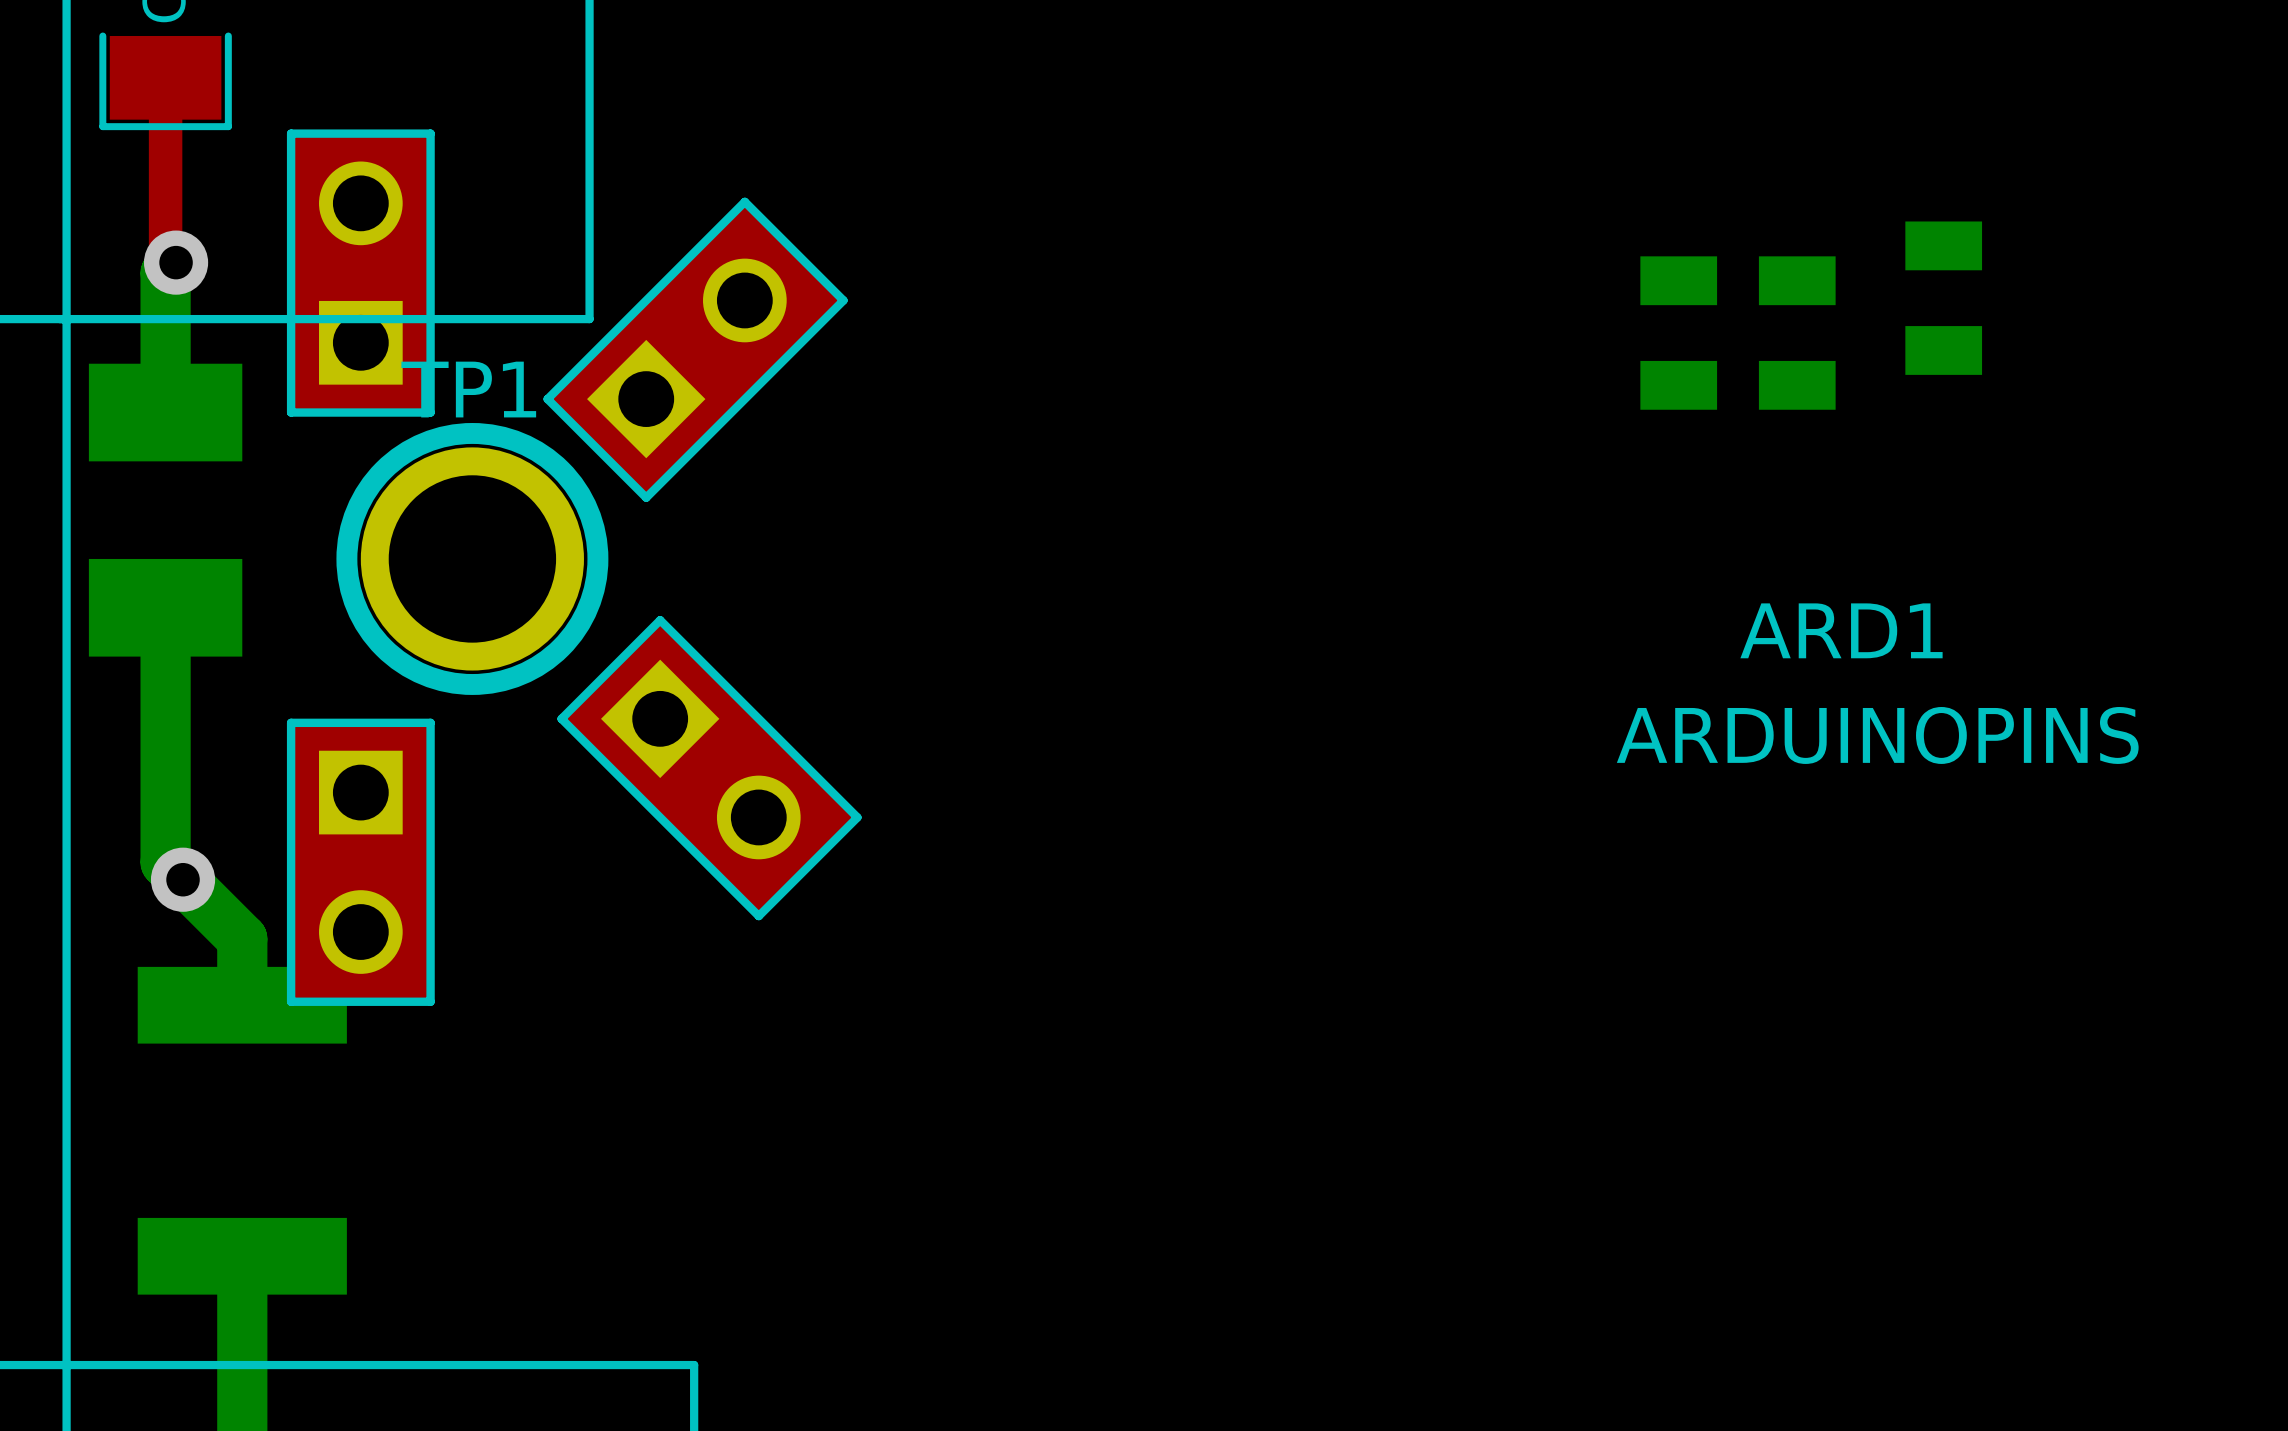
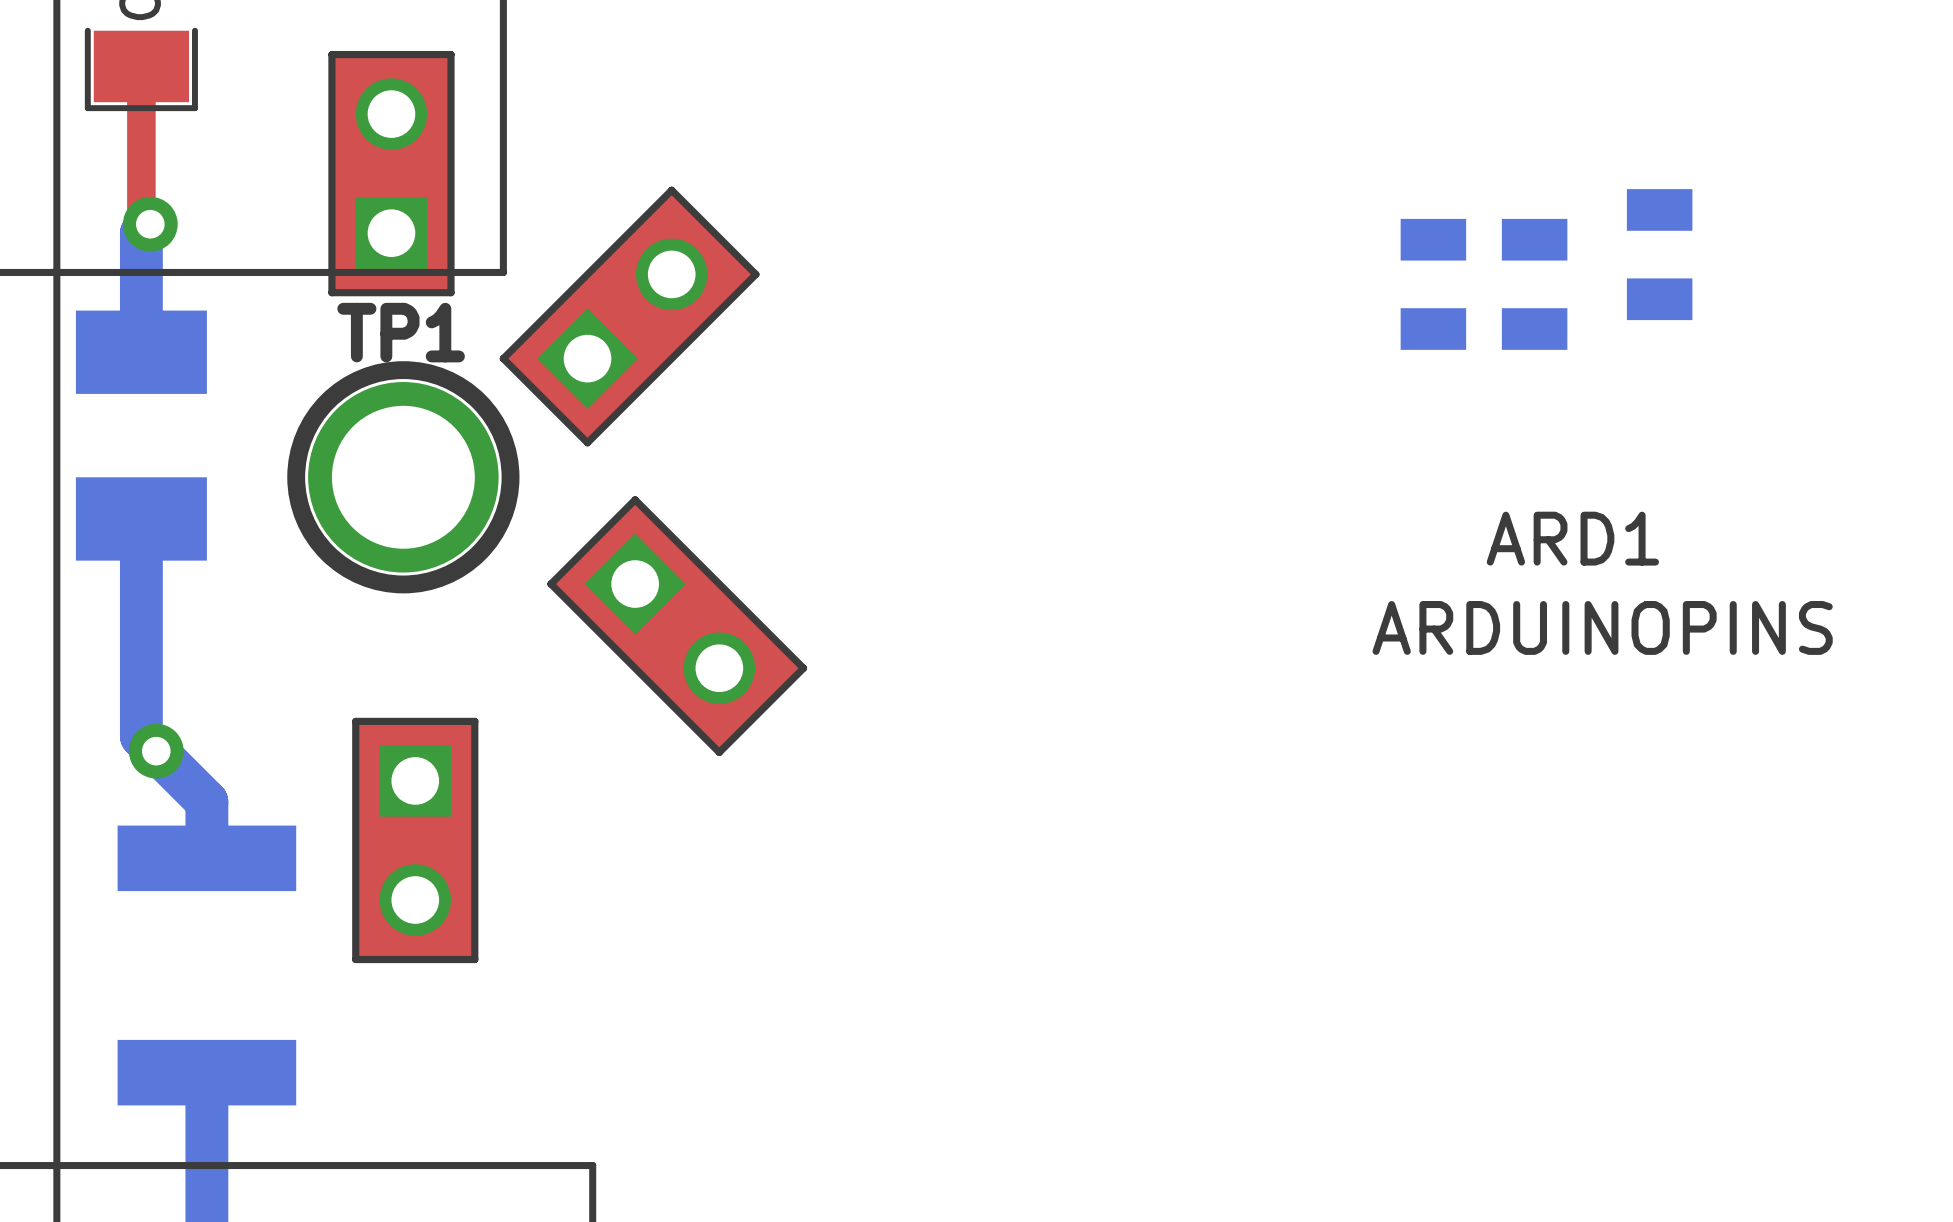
part position: (360, 273) -> (391, 173)
part position: (695, 349) -> (629, 316)
part position: (709, 768) -> (677, 626)
part position: (360, 862) -> (415, 840)

